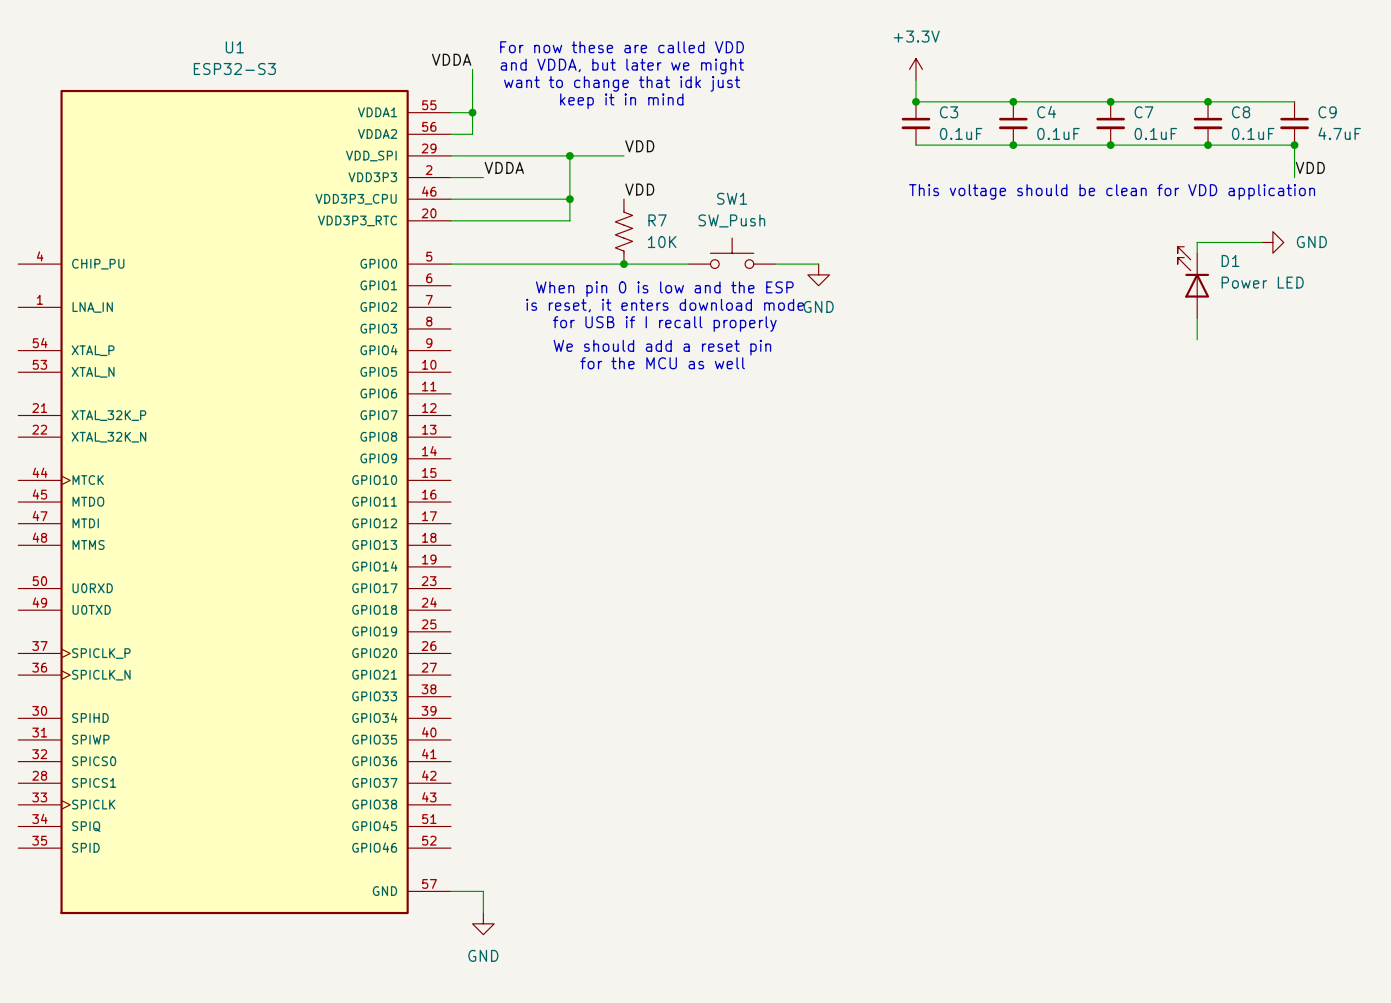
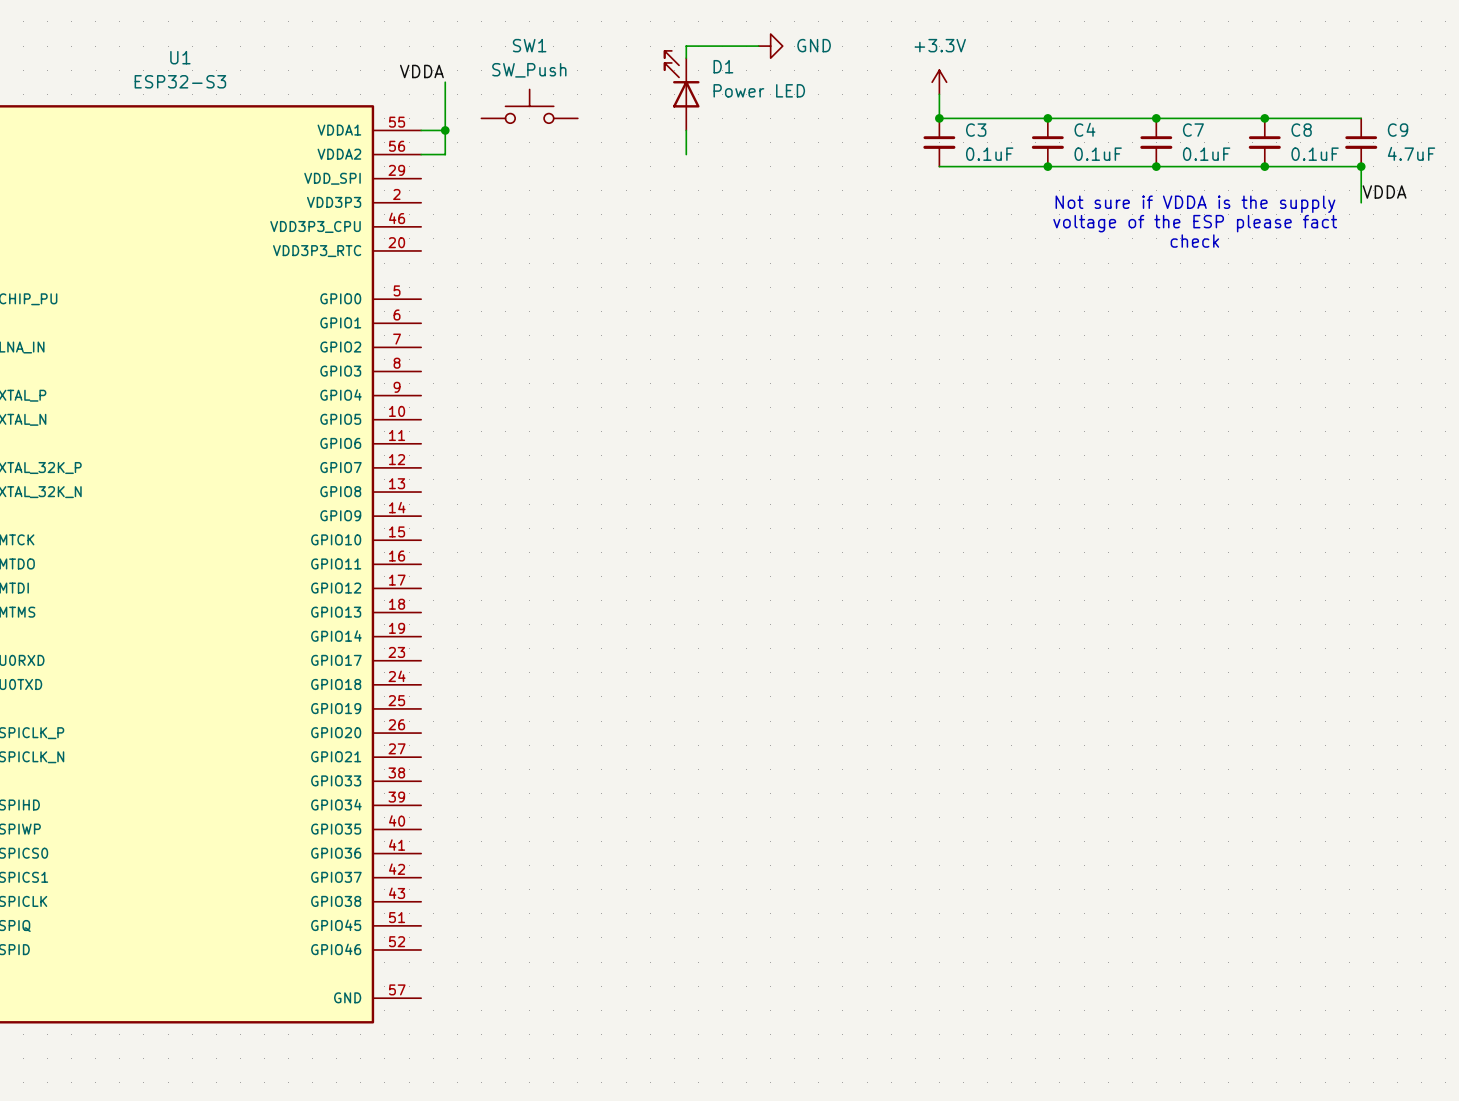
wire: none -> (758, 46) (686, 46) (686, 58)
power symbol: none -> GND (770, 46)
text: For now these are called VDD (622, 47) -> none
text: and VDDA, but later we might (622, 66) -> none
text: want to change that idk just (622, 83) -> none
text: keep it in mind (621, 101) -> none
wire: none -> (686, 130) (686, 154)
label: VDD (639, 146) -> none
wire: (450, 155) (623, 155) -> none
wire: (569, 155) (569, 220) (450, 220) -> none
junction: (569, 155) -> none
label: VDDA (504, 167) -> none
label: VDD (1310, 167) -> VDDA (1384, 192)
wire: (450, 177) (483, 177) -> none
text: none -> Not sure if VDDA is the supply (1195, 204)
label: VDD (639, 189) -> none
text: This voltage should be clean for VDD application (1112, 191) -> none
text: none -> voltage of the ESP please fact (1195, 223)
wire: (450, 199) (569, 199) -> none
junction: (569, 199) -> none
text: none -> check (1194, 241)
R7: 10K (623, 231) -> none
wire: (1262, 242) (1197, 242) (1197, 253) -> none
power symbol: GND (1272, 242) -> none
SW1 position: (732, 253) -> (529, 106)
wire: (450, 264) (688, 264) -> none
junction: (623, 264) -> none
wire: (775, 264) (818, 264) -> none
power symbol: GND (818, 274) -> none
D1 position: (1193, 282) -> (682, 90)
text: When pin 0 is low and the ESP (664, 289) -> none
text: is reset, it enters download mode (665, 305) -> none
wire: (1197, 318) (1197, 339) -> none
text: for USB if I recall properly (664, 324) -> none
text: We should add a reset pin (662, 347) -> none
text: for the MCU as well (662, 363) -> none
wire: (450, 891) (483, 891) (483, 913) -> none
power symbol: GND (483, 923) -> none

